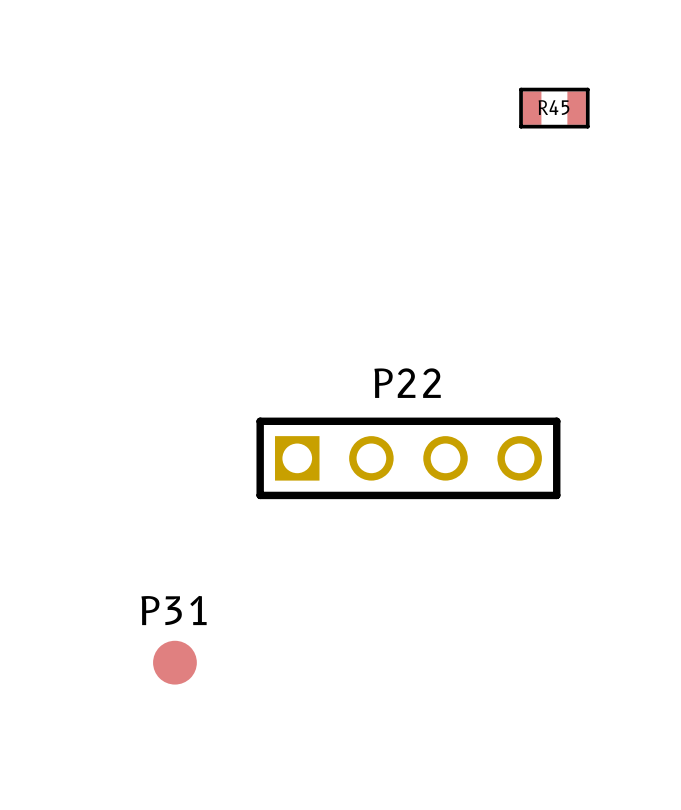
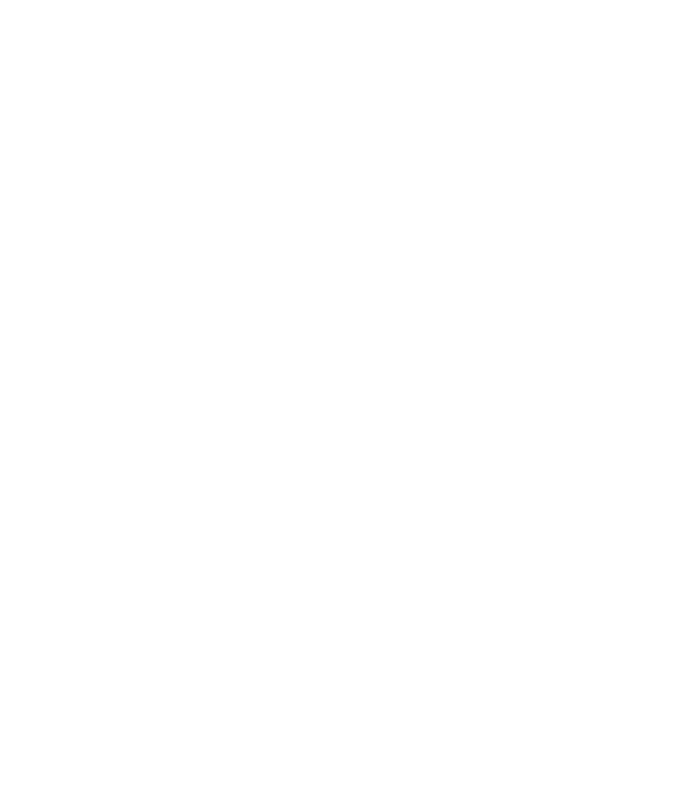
R45: (554, 108) -> none
P22: (408, 458) -> none
P31: (174, 662) -> none

